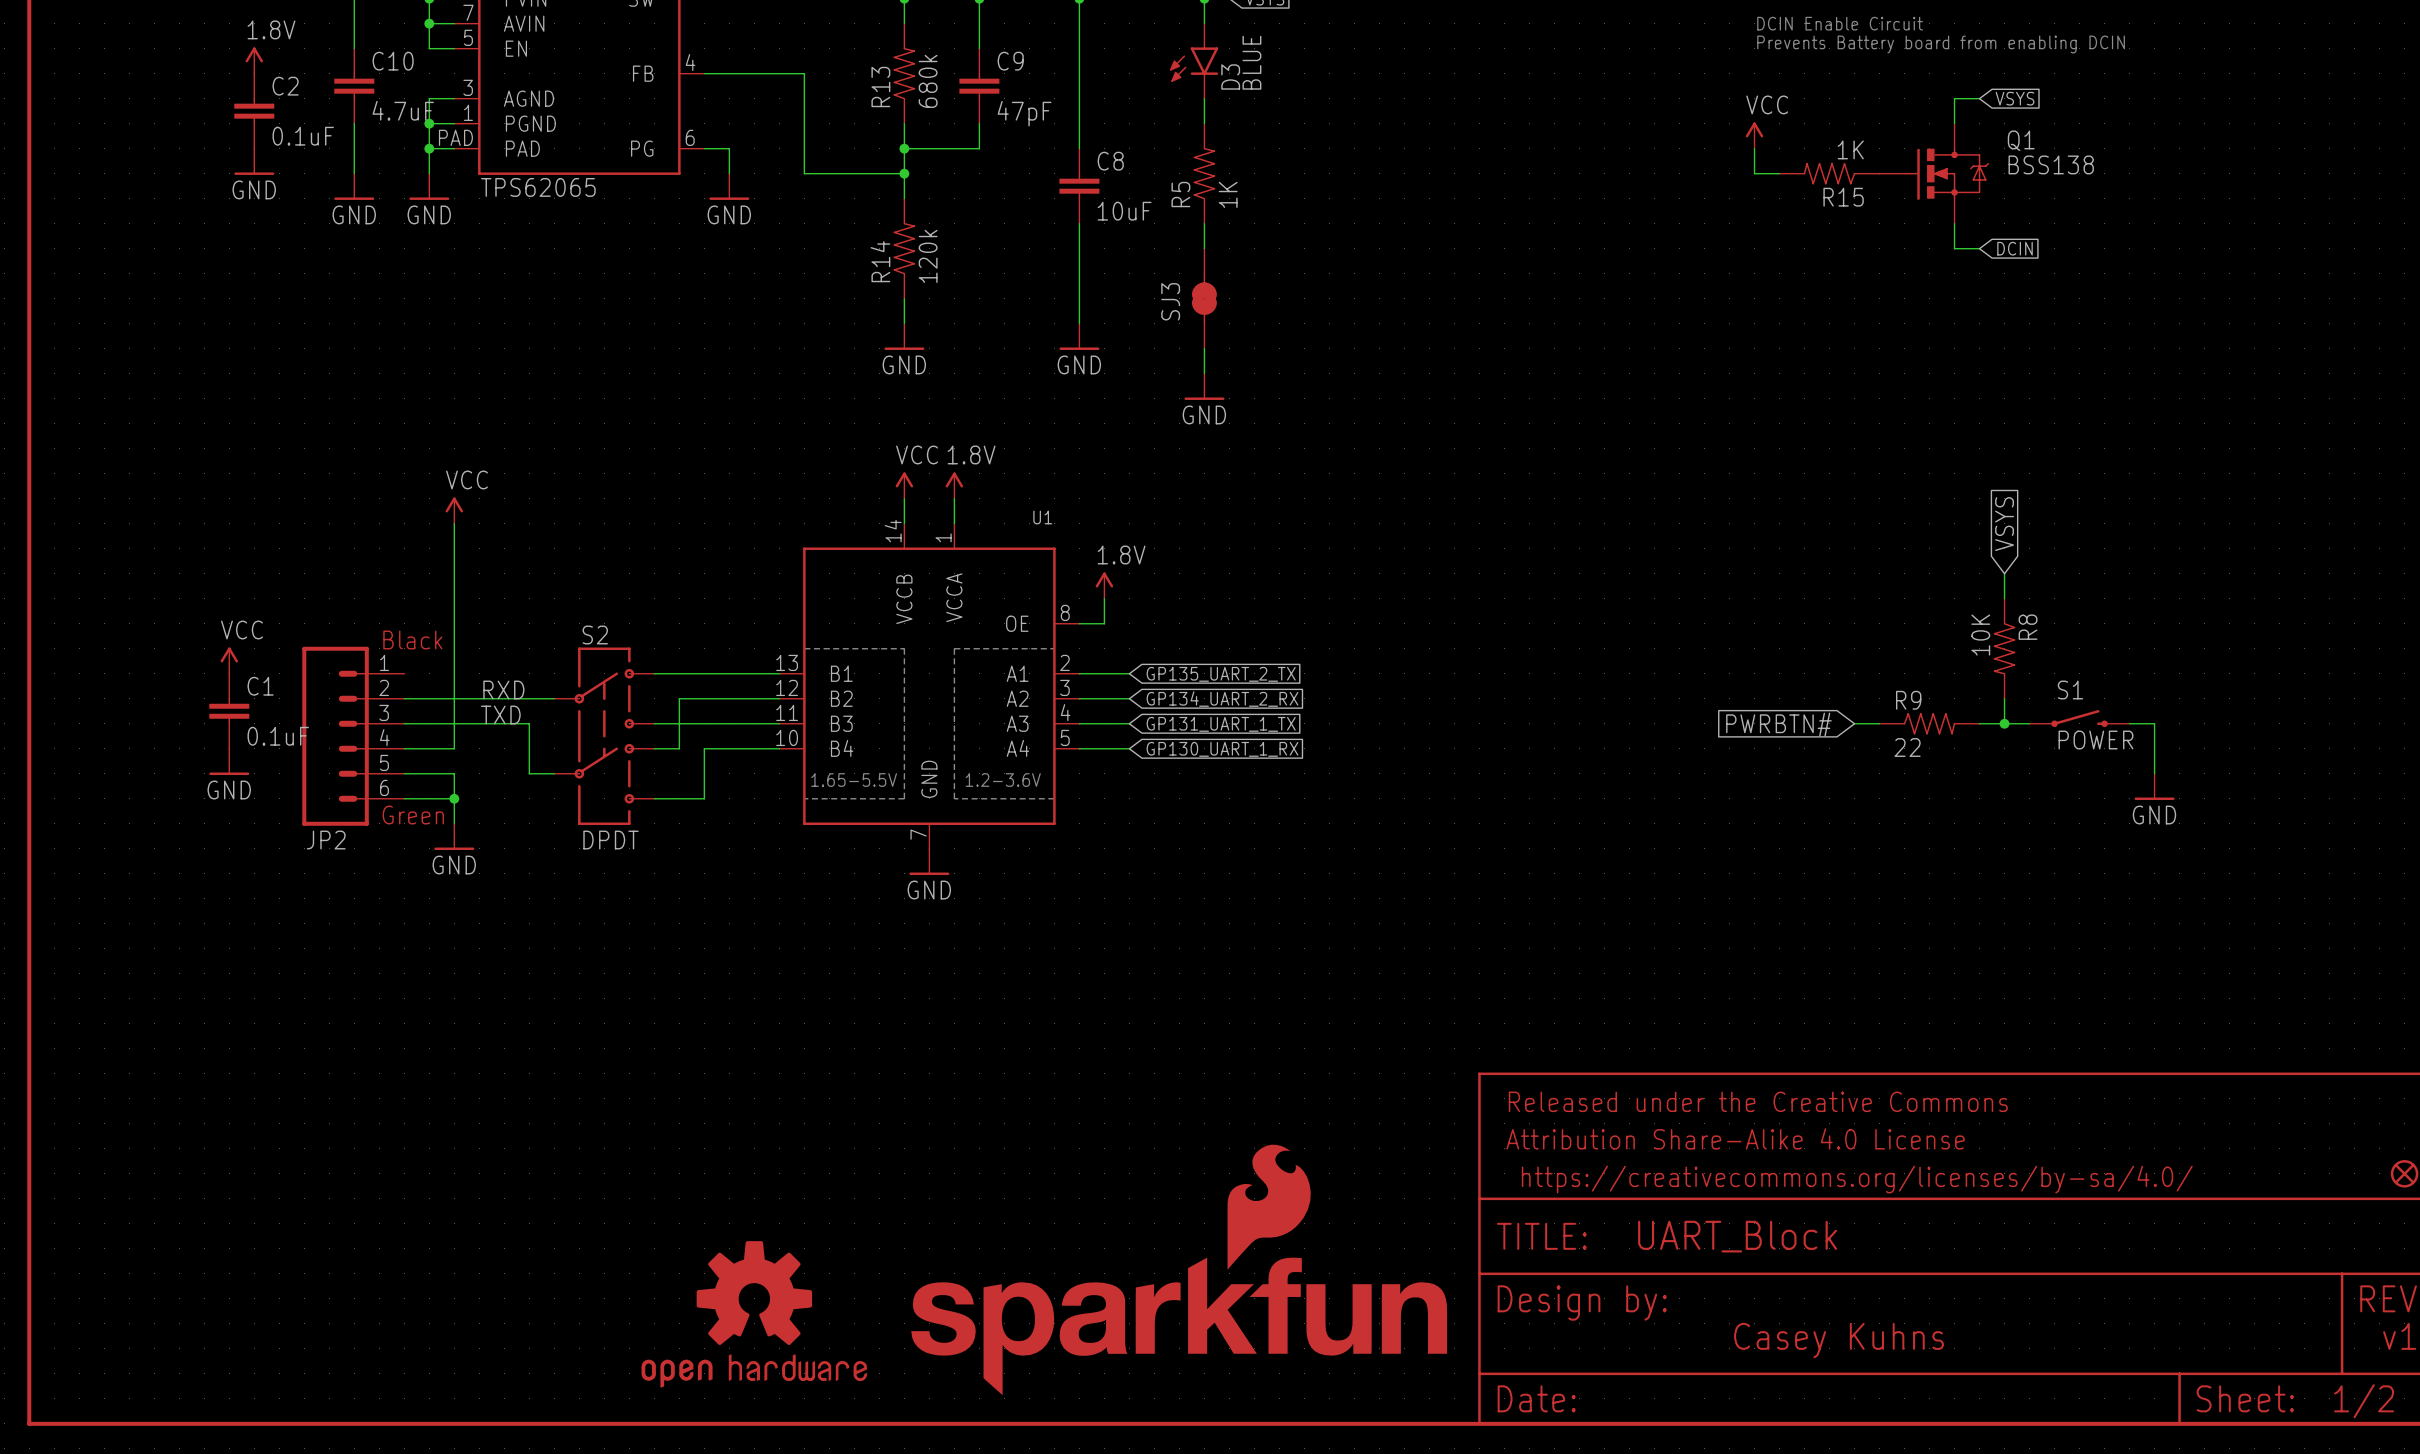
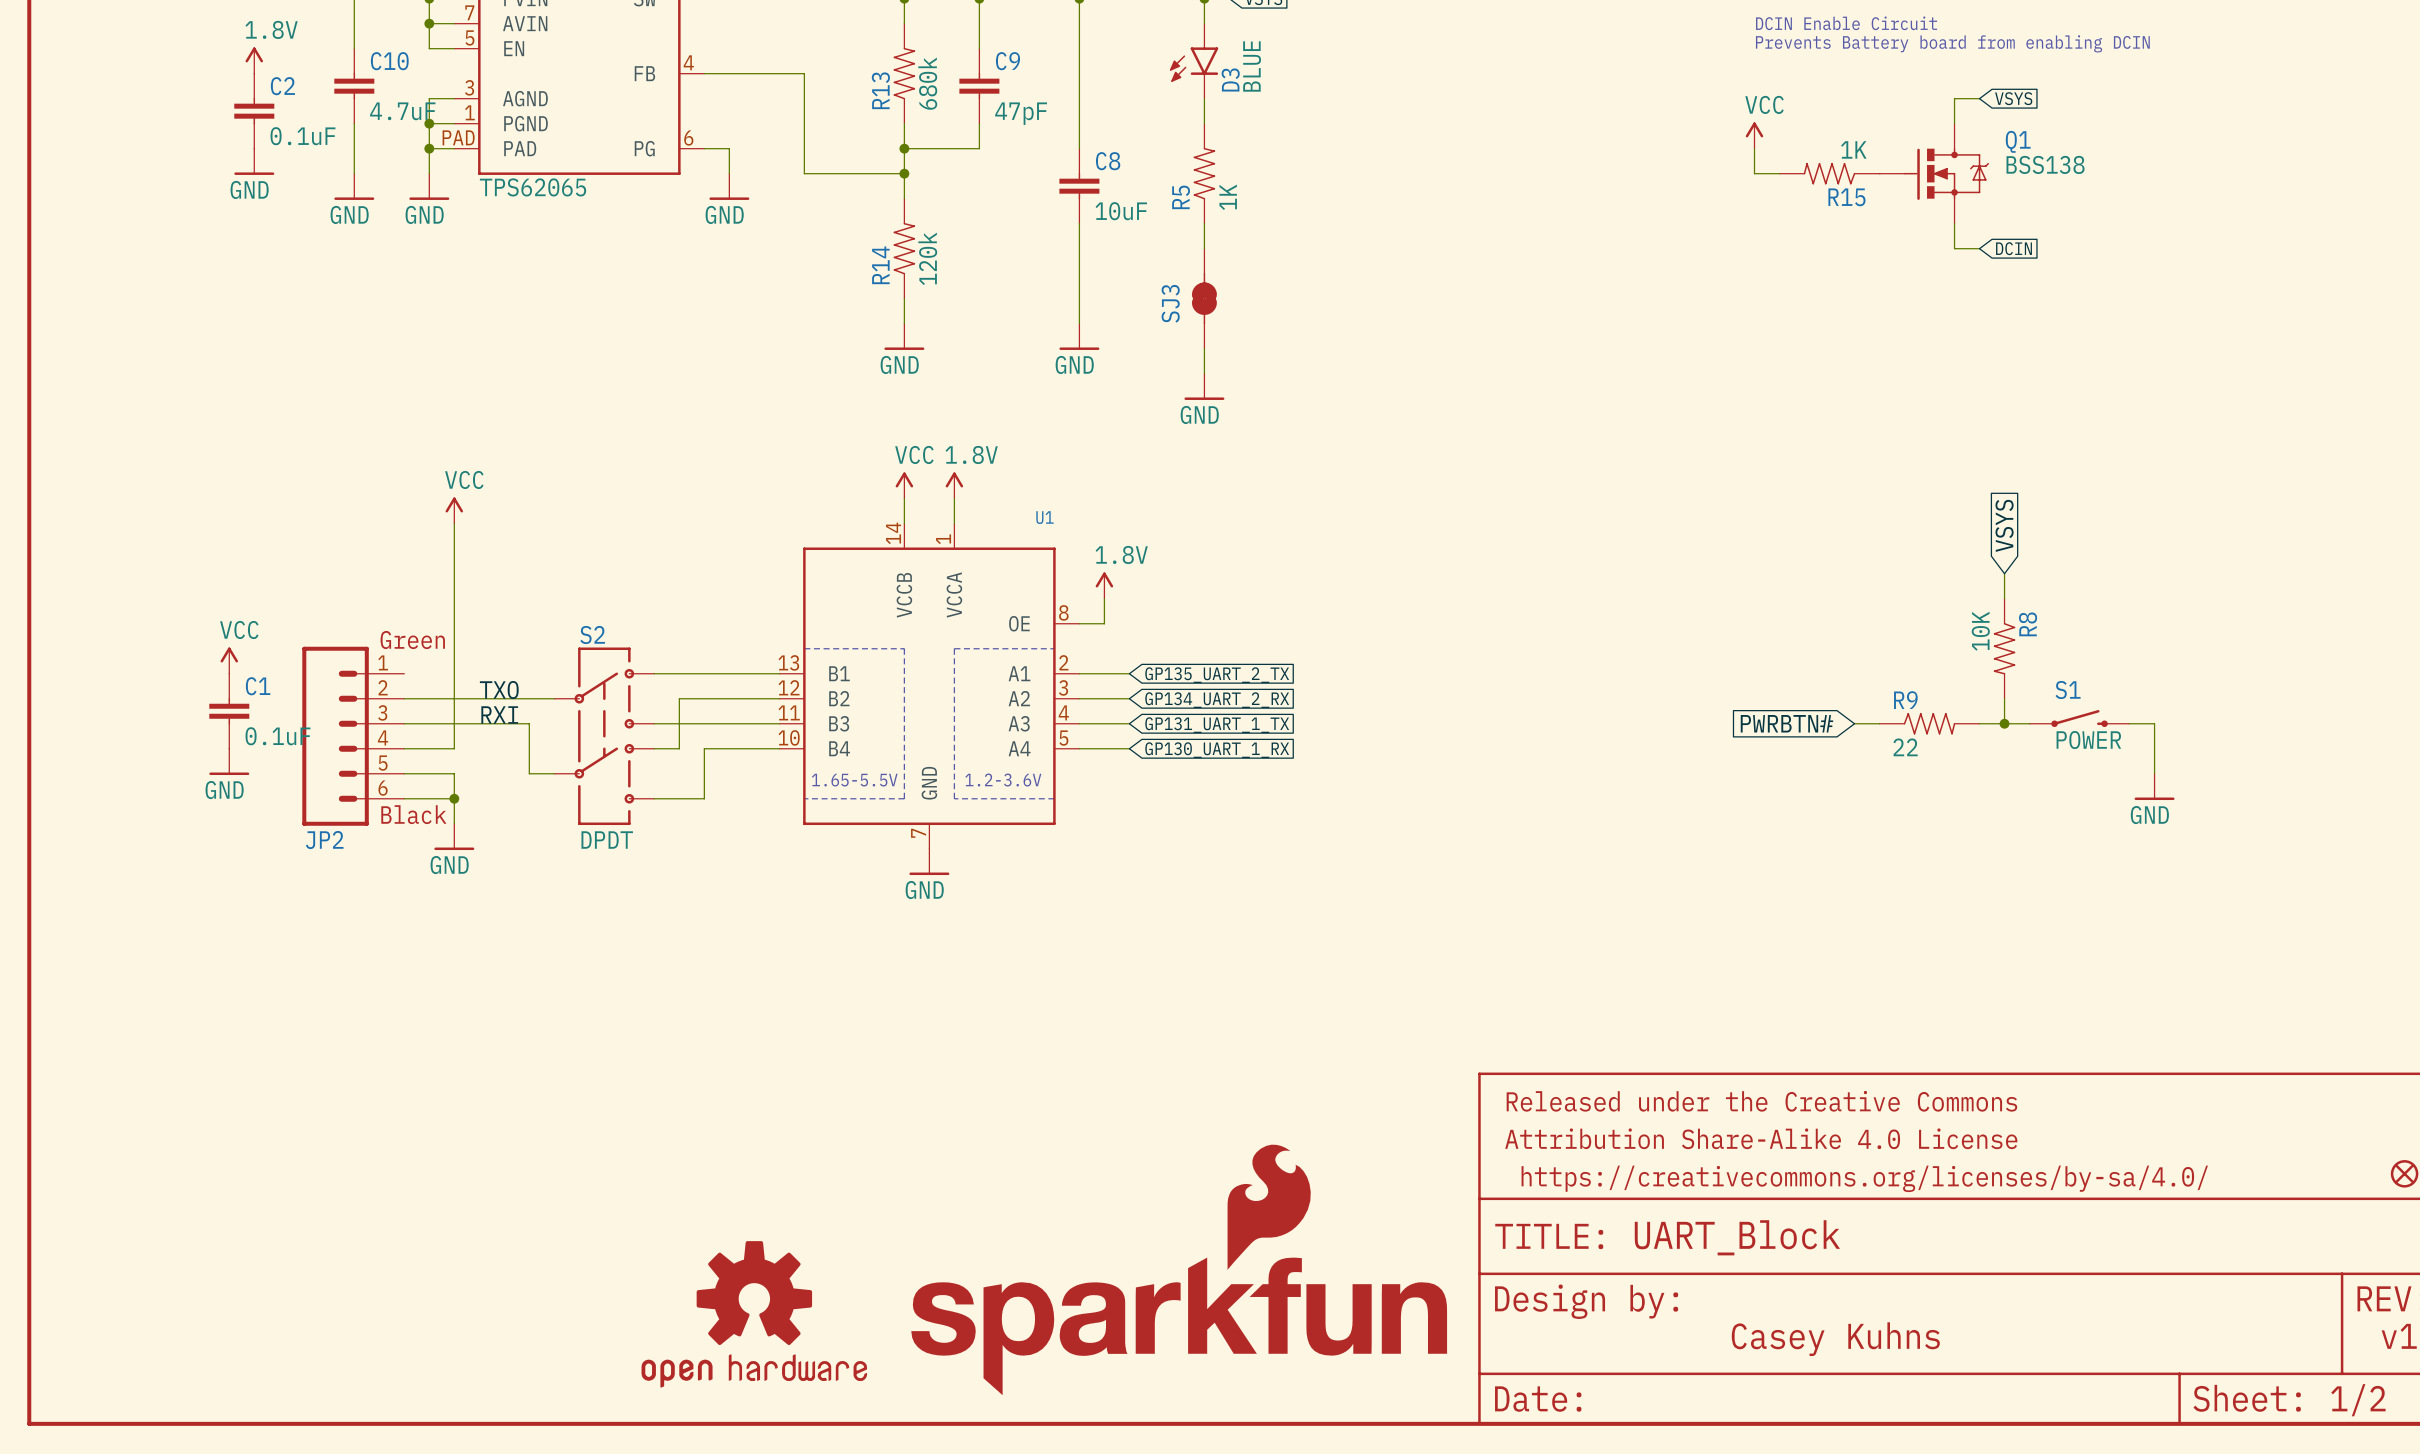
text: Black (412, 639) -> Green (412, 639)
label: RXD (503, 690) -> TXO (499, 690)
label: TXD (500, 715) -> RXI (499, 715)
text: Green (413, 815) -> Black (413, 814)

